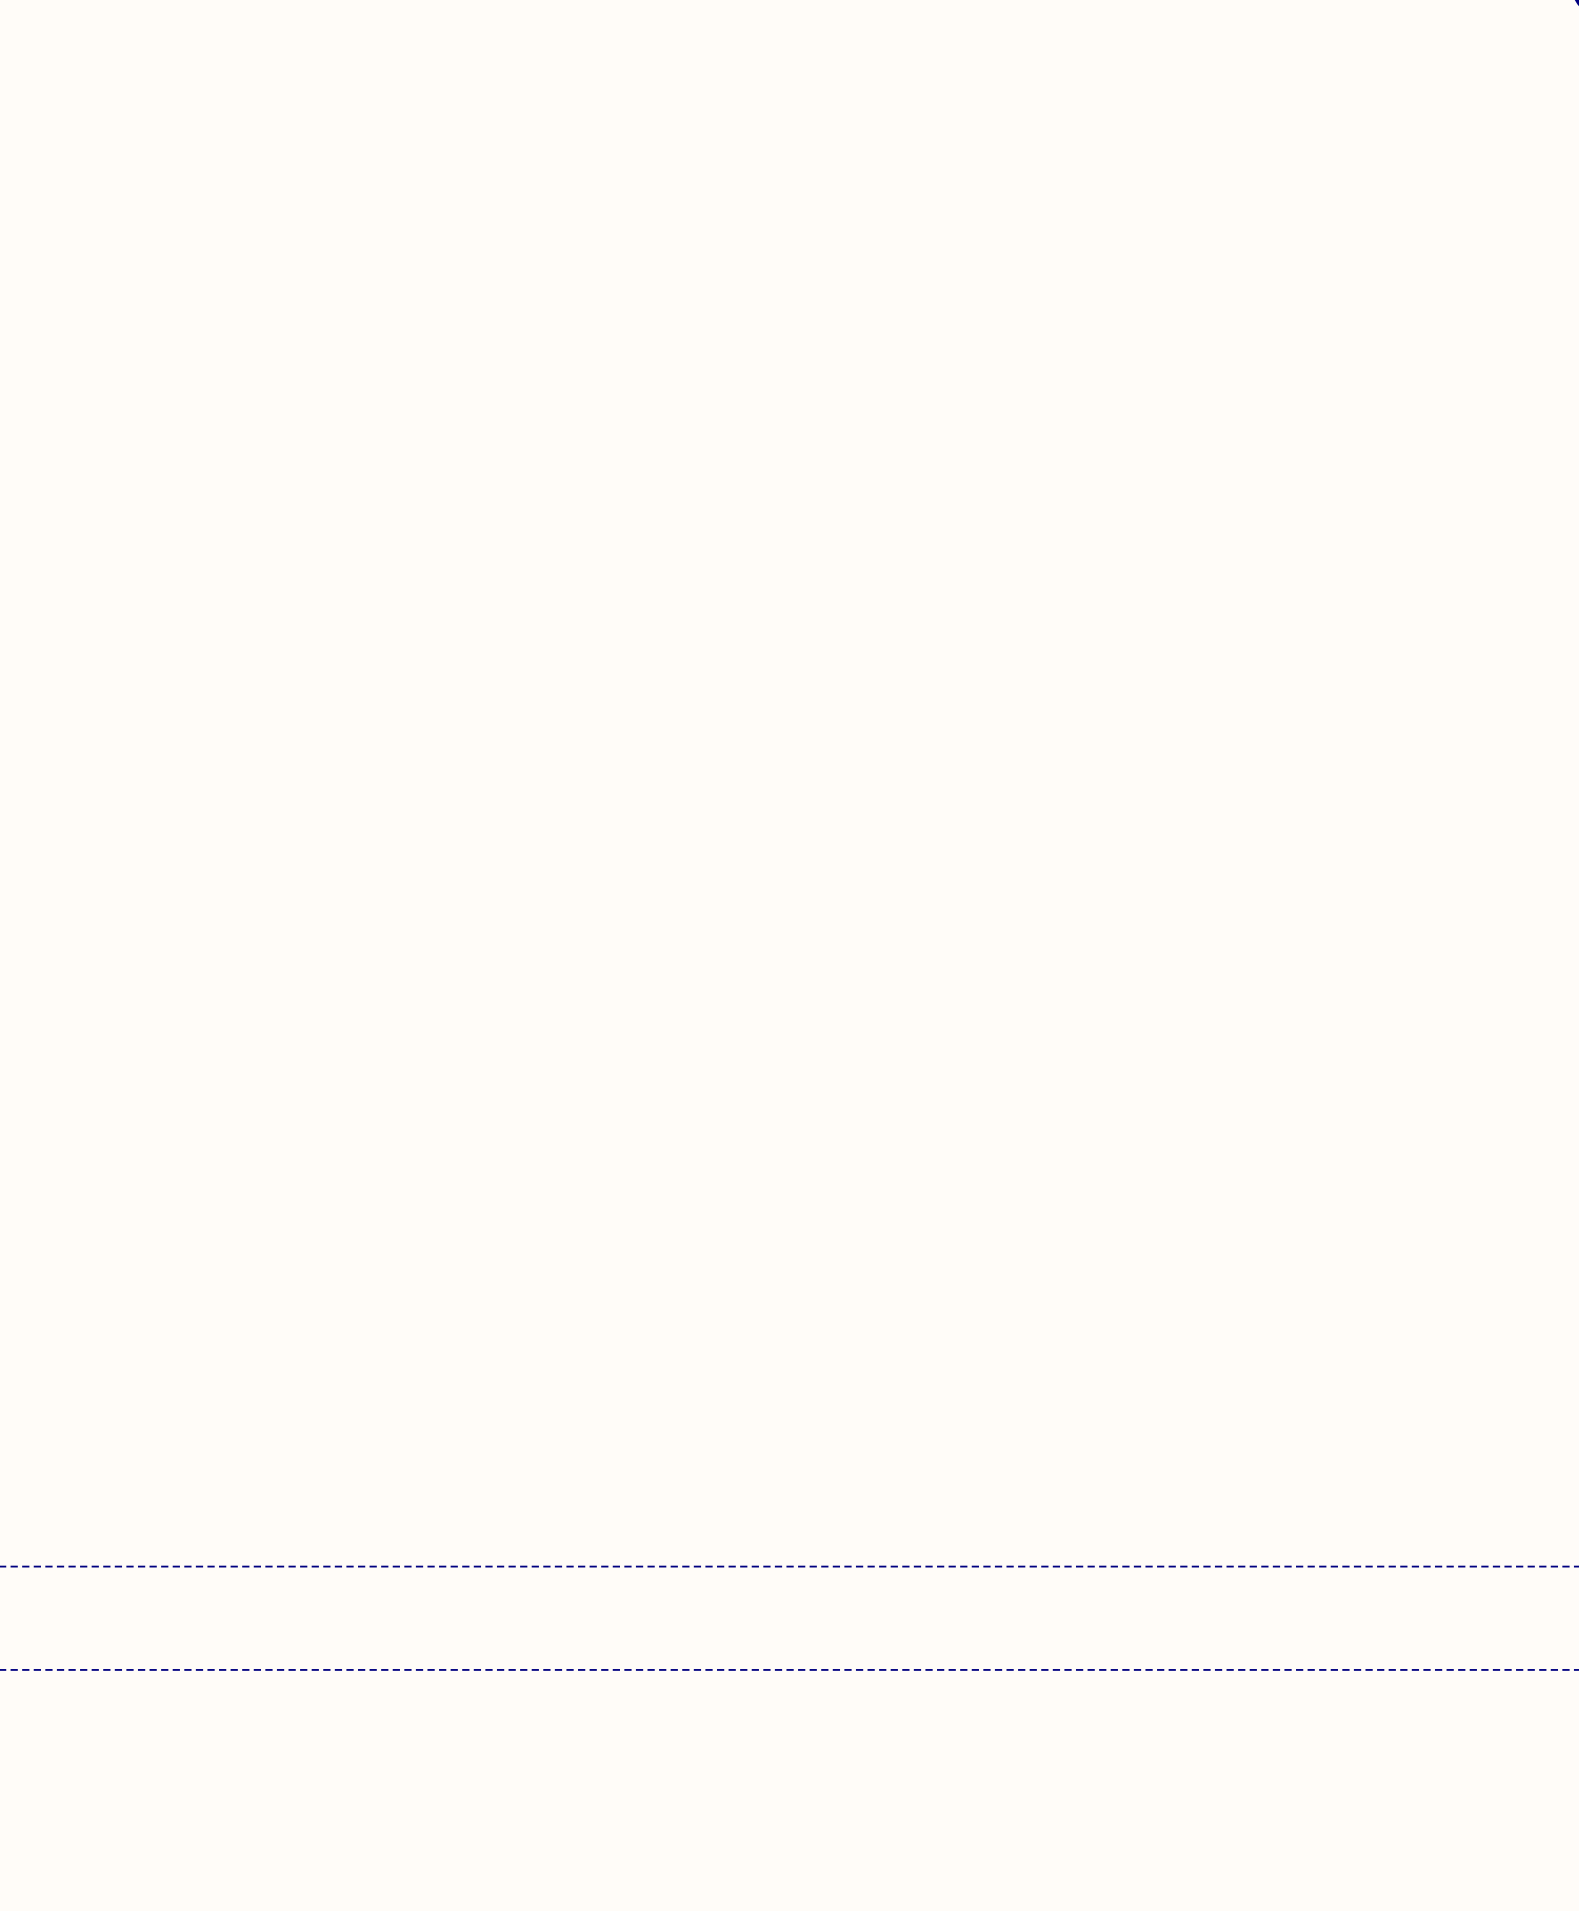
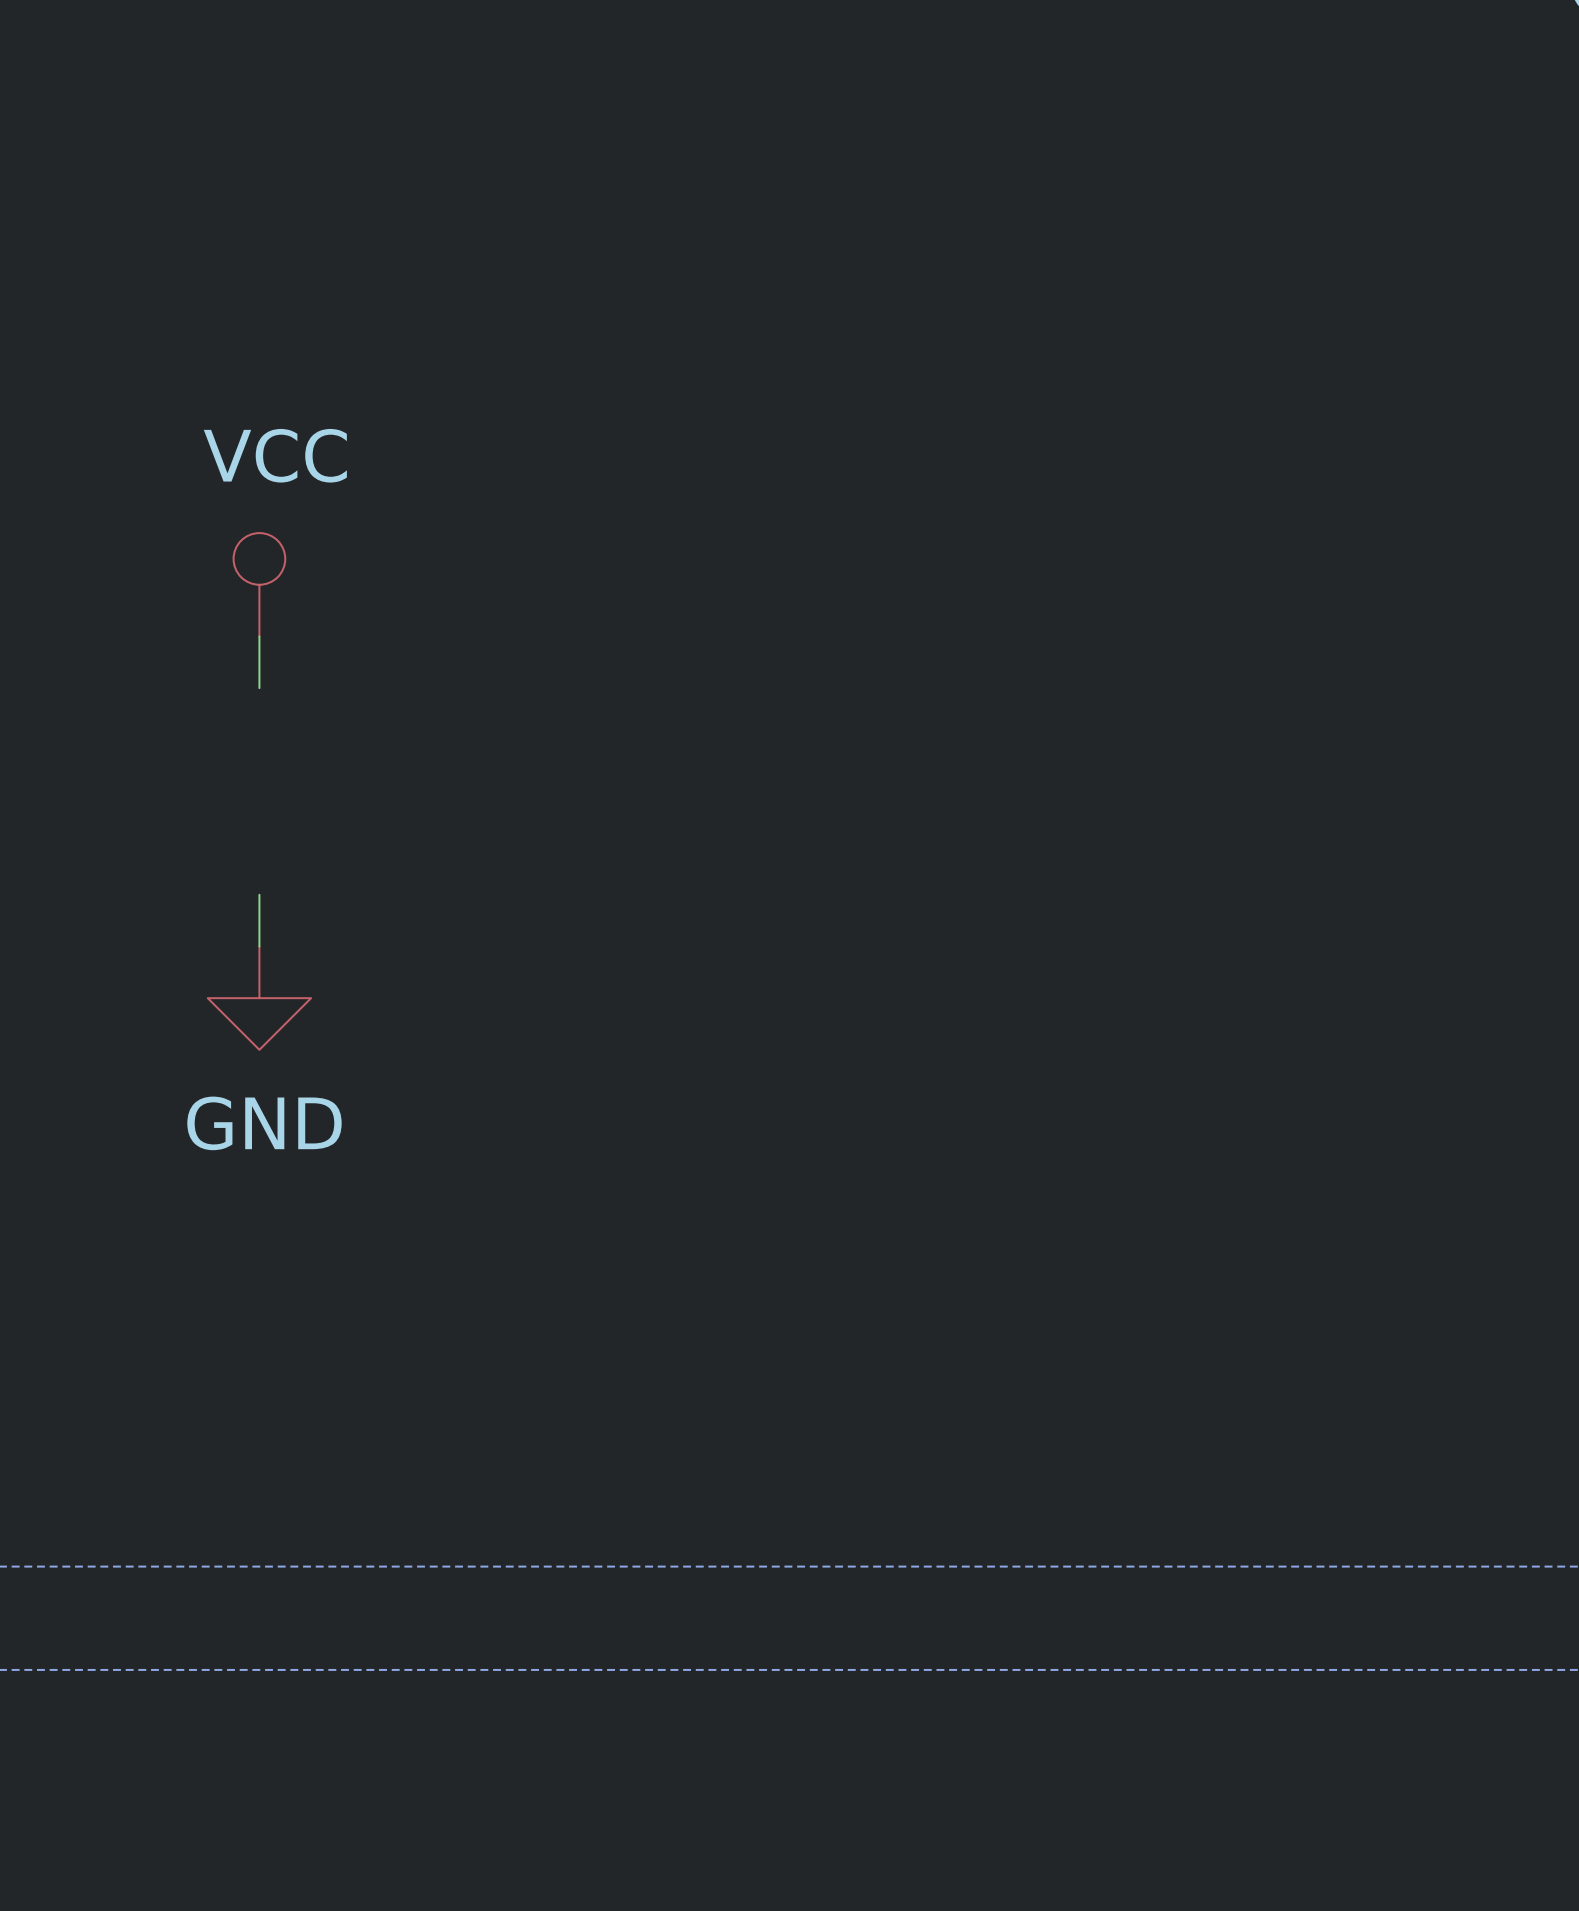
power symbol: none -> VCC (259, 584)
wire: none -> (259, 636) (259, 688)
wire: none -> (259, 894) (259, 946)
power symbol: none -> GND (259, 998)

